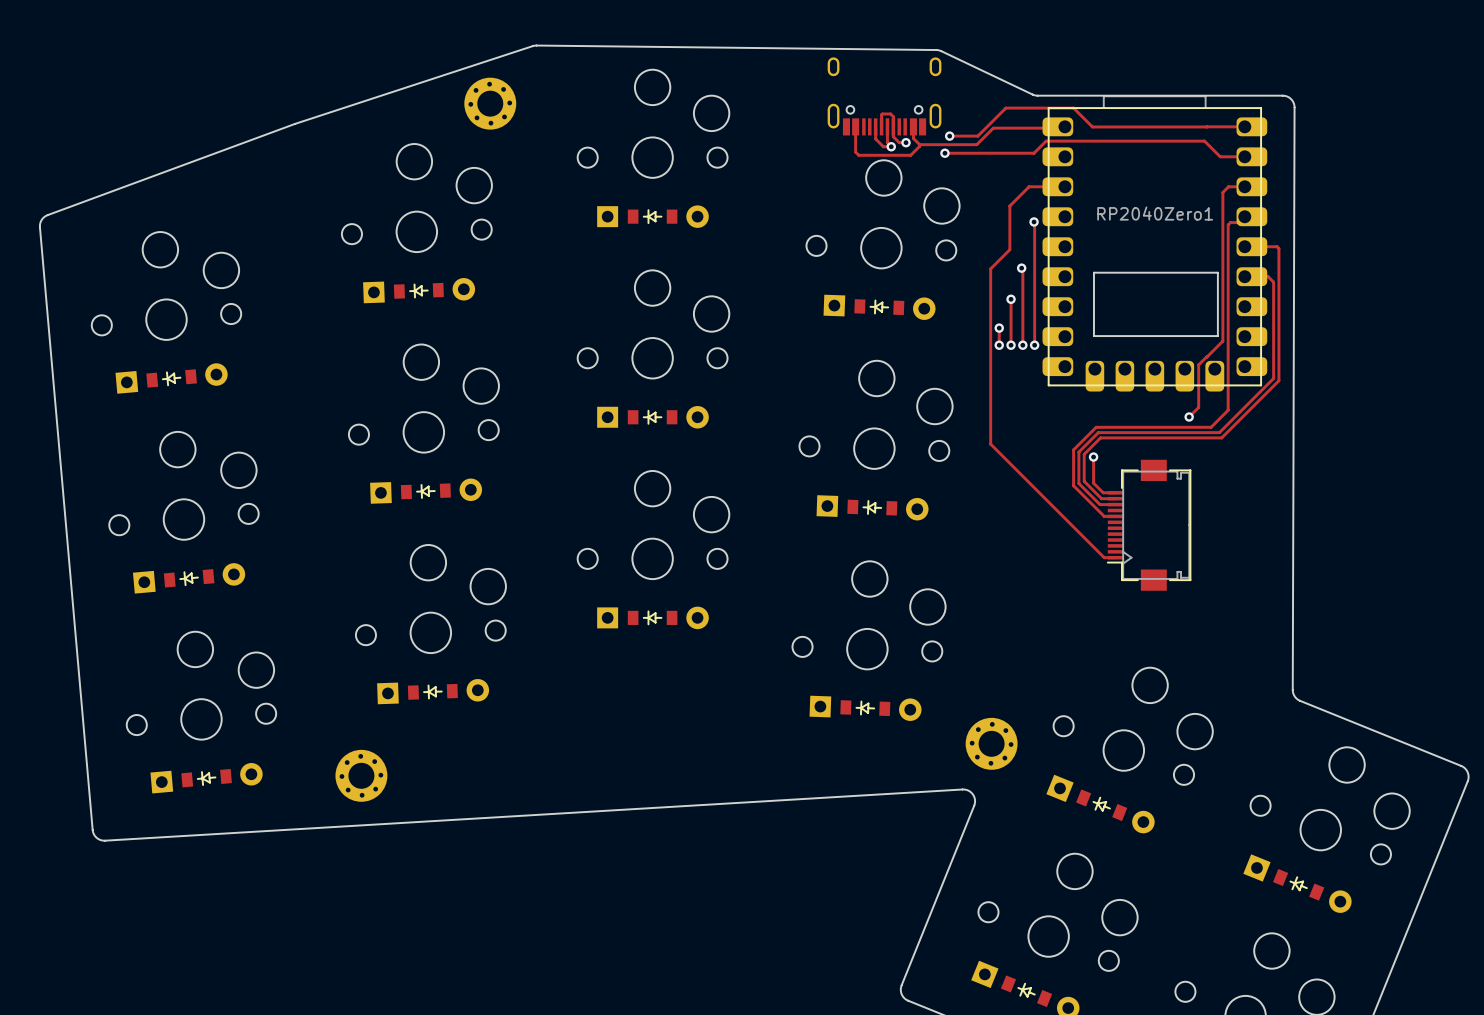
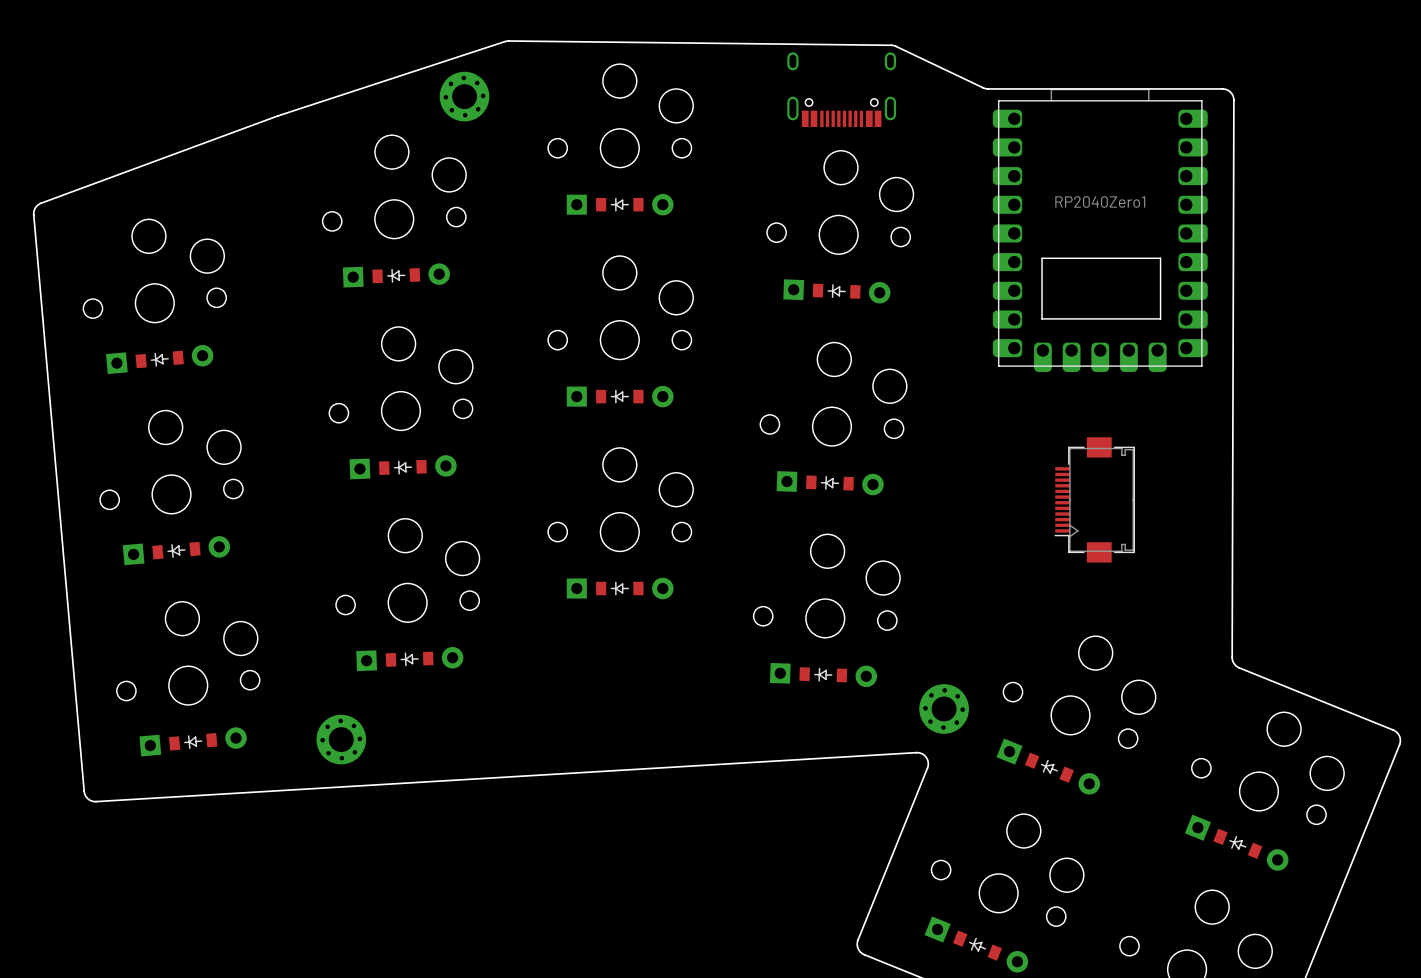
track: (855, 126) (855, 152) (858, 155) (910, 155) (919, 144) -> none
track: (875, 126) (875, 139) (883, 146) (891, 146) (887, 142) (887, 126) -> none
track: (881, 126) (881, 114) (890, 113) (893, 116) (893, 136) (899, 142) (906, 142) -> none
track: (913, 126) (913, 138) (919, 144) -> none
track: (1064, 126) (993, 128) (976, 144) (919, 144) -> none
track: (1206, 126) (1092, 126) (1073, 108) (1005, 108) (977, 136) (949, 136) -> none
track: (1207, 126) (1244, 126) -> none
via: (949, 136) -> none
via: (906, 142) -> none
via: (891, 146) -> none
track: (944, 153) (1034, 153) (1046, 141) (1204, 141) (1220, 156) (1244, 156) -> none
via: (944, 153) -> none
track: (1064, 186) (1029, 186) (1009, 206) (1009, 249) (990, 268) (990, 444) (1104, 557) (1115, 557) -> none
track: (1244, 186) (1228, 186) (1222, 192) (1222, 341) (1198, 364) (1198, 407) (1189, 416) -> none
track: (1244, 216) (1239, 222) (1230, 222) (1228, 224) (1228, 410) (1211, 427) (1096, 427) (1073, 449) (1073, 485) (1104, 516) (1115, 516) -> none
track: (1034, 221) (1034, 345) -> none
via: (1034, 221) -> none
track: (1244, 246) (1277, 246) (1278, 248) (1278, 380) (1221, 437) (1100, 437) (1084, 454) (1084, 481) (1101, 498) (1115, 498) -> none
track: (1021, 268) (1022, 345) -> none
via: (1021, 268) -> none
track: (1244, 276) (1268, 276) (1273, 282) (1273, 378) (1219, 432) (1098, 432) (1078, 452) (1078, 483) (1099, 504) (1115, 504) -> none
track: (1011, 299) (1011, 345) -> none
via: (1011, 299) -> none
track: (999, 328) (999, 345) -> none
via: (999, 328) -> none
via: (999, 345) -> none
via: (1011, 345) -> none
via: (1022, 345) -> none
via: (1034, 345) -> none
via: (1189, 416) -> none
track: (1093, 457) (1093, 483) (1103, 492) (1115, 492) -> none
via: (1093, 457) -> none

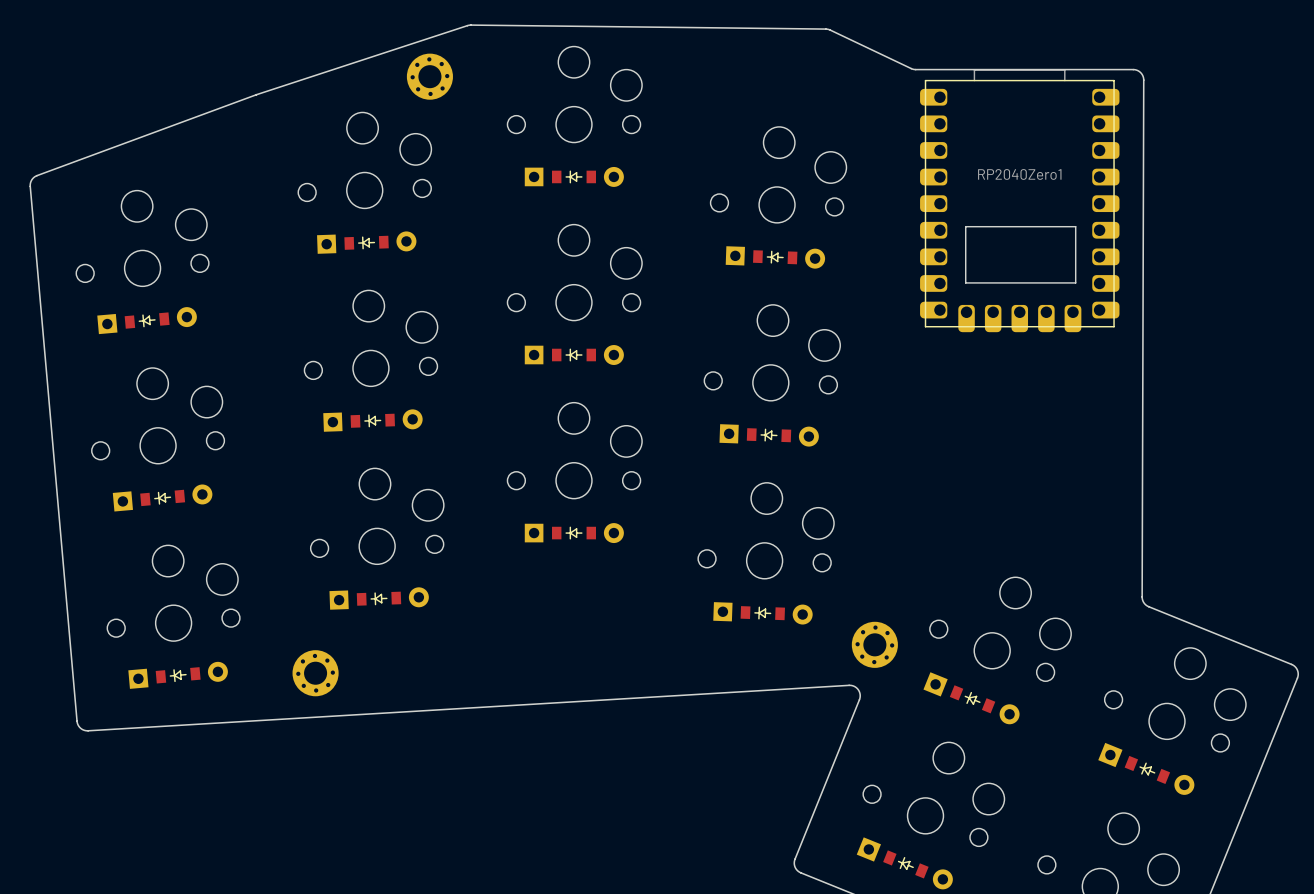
part: (841, 89) -> none
part: (1094, 499) -> none

